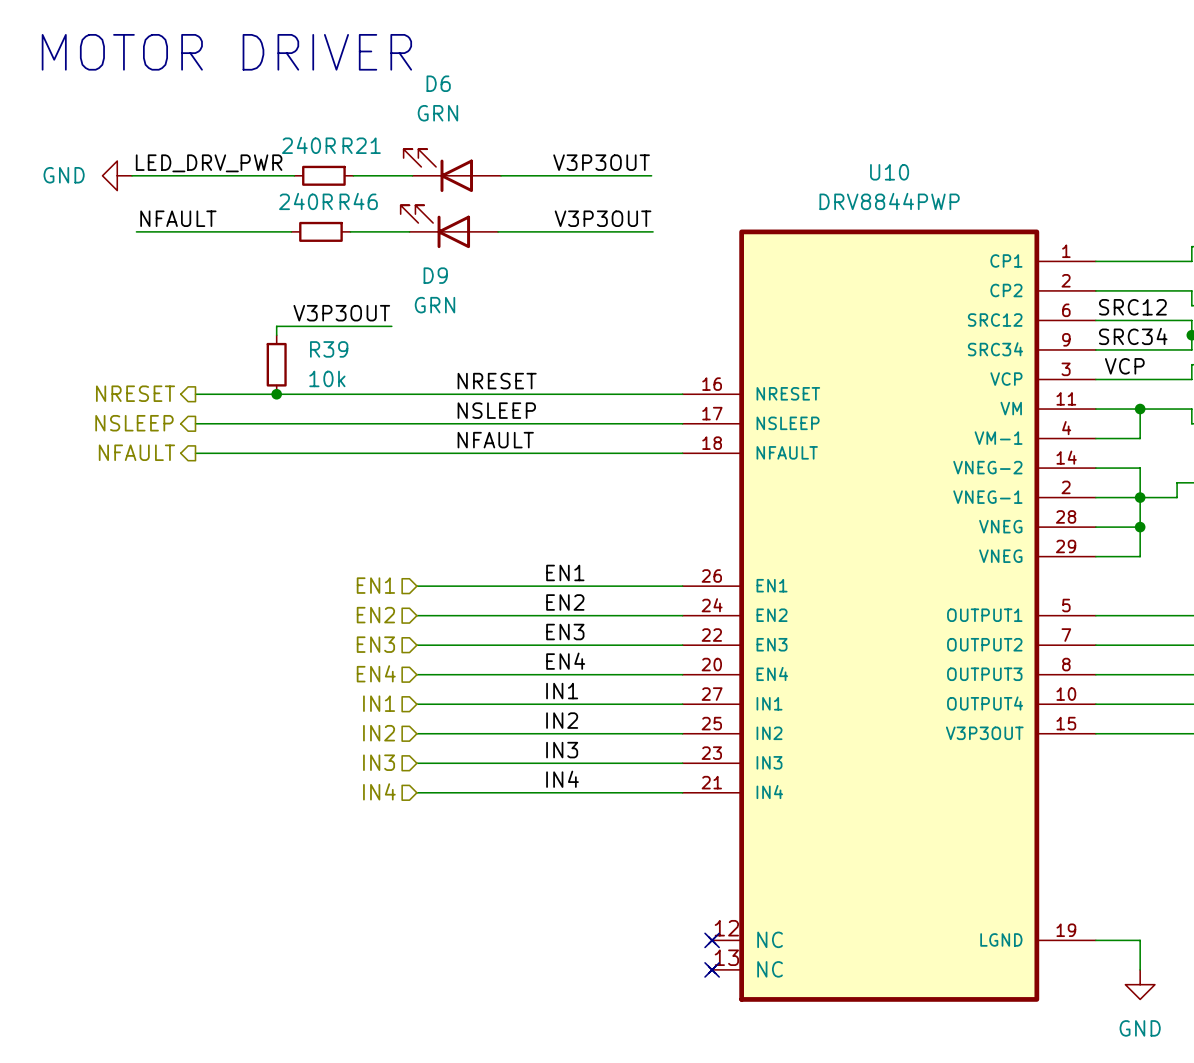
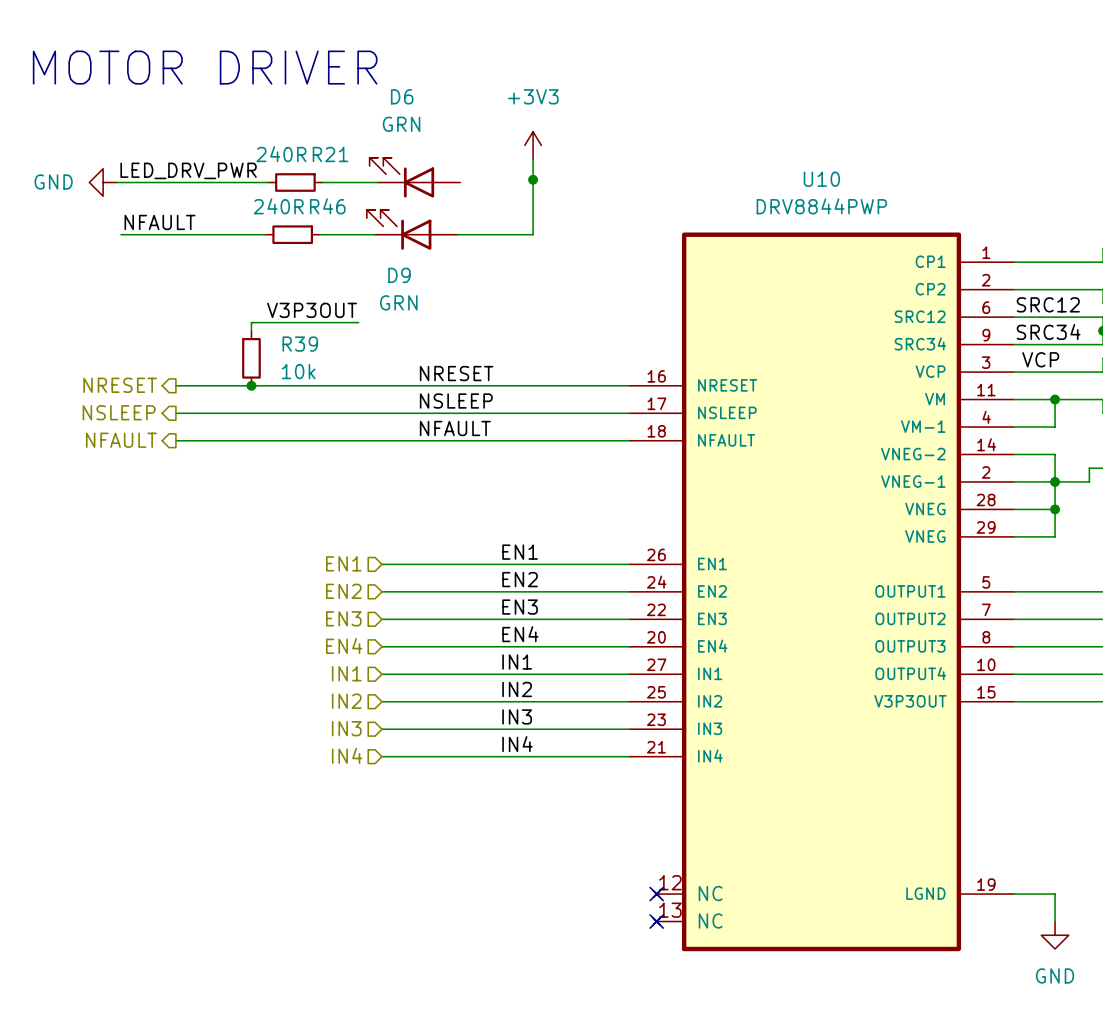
power symbol: none -> +3V3 (533, 145)
label: V3P3OUT (601, 162) -> none
junction: none -> (533, 179)
wire: (501, 175) (651, 175) -> none
label: V3P3OUT (603, 218) -> none
wire: (579, 231) (653, 231) -> (533, 234) (533, 159)

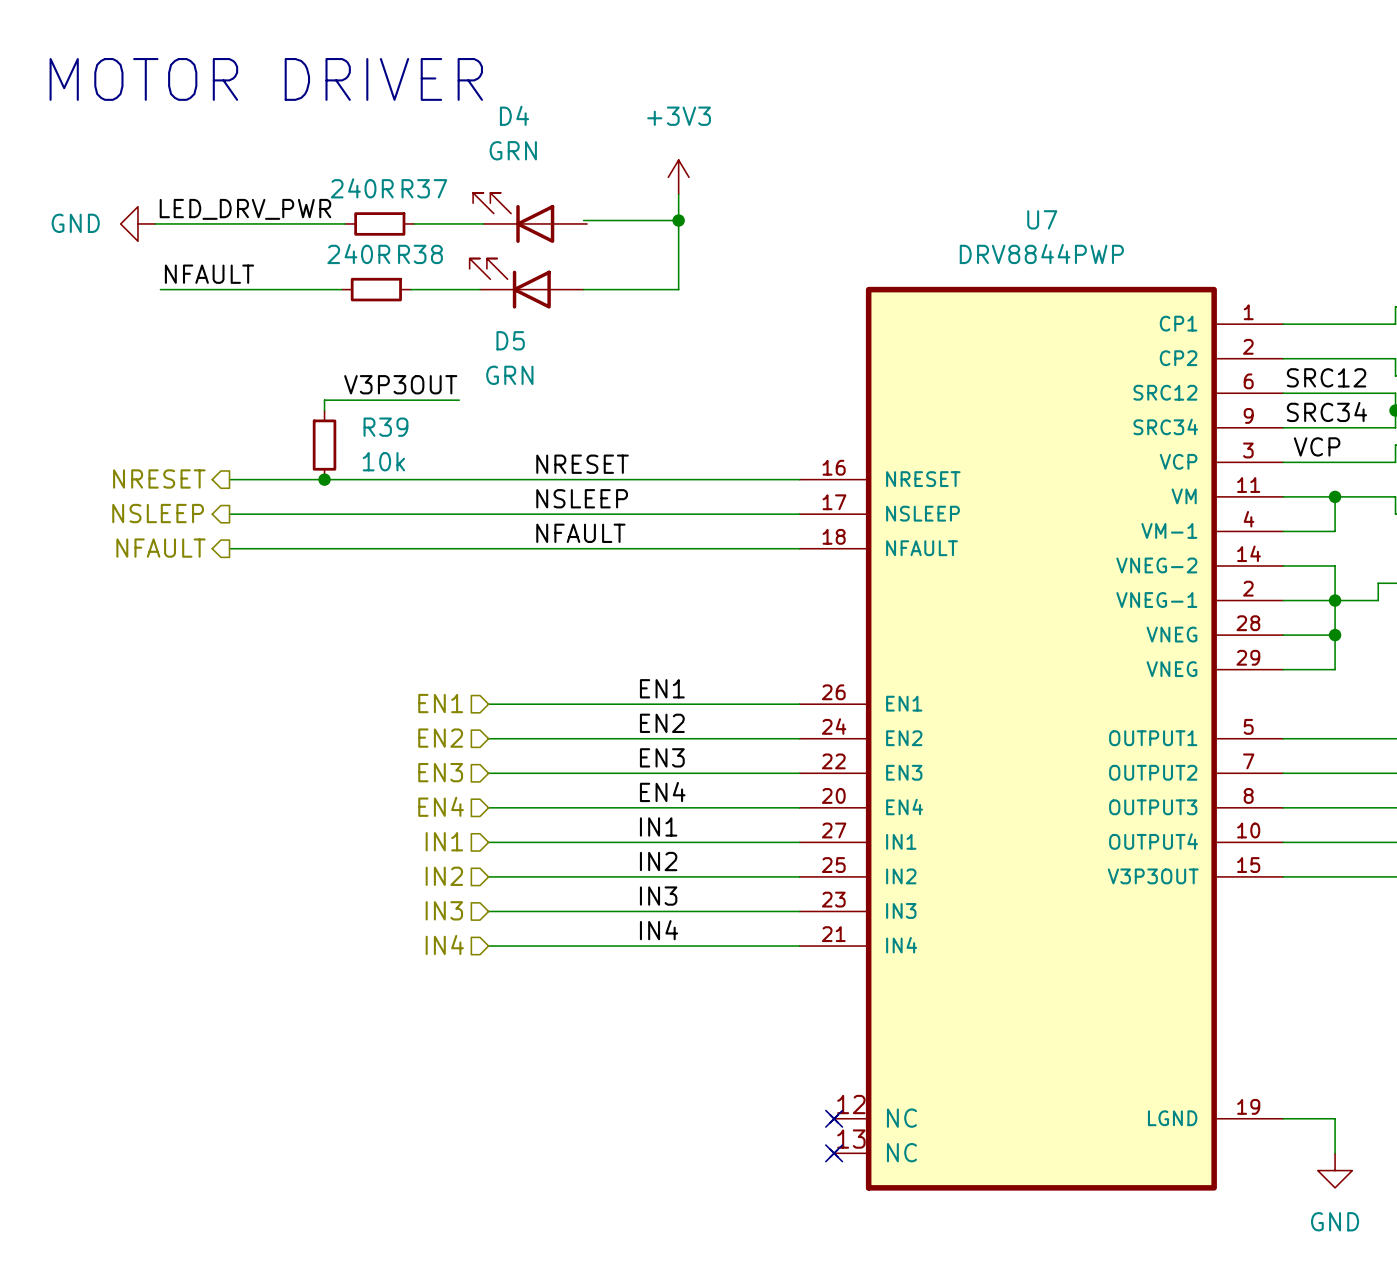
D6 name: D6 (402, 96) -> D4 (514, 115)
R21 name: R21 (330, 154) -> R37 (424, 188)
wire: none -> (583, 220) (678, 220)
U10 name: U10 (821, 179) -> U7 (1042, 219)
R46 name: R46 (327, 206) -> R38 (420, 254)
D9 name: D9 (399, 275) -> D5 (510, 340)

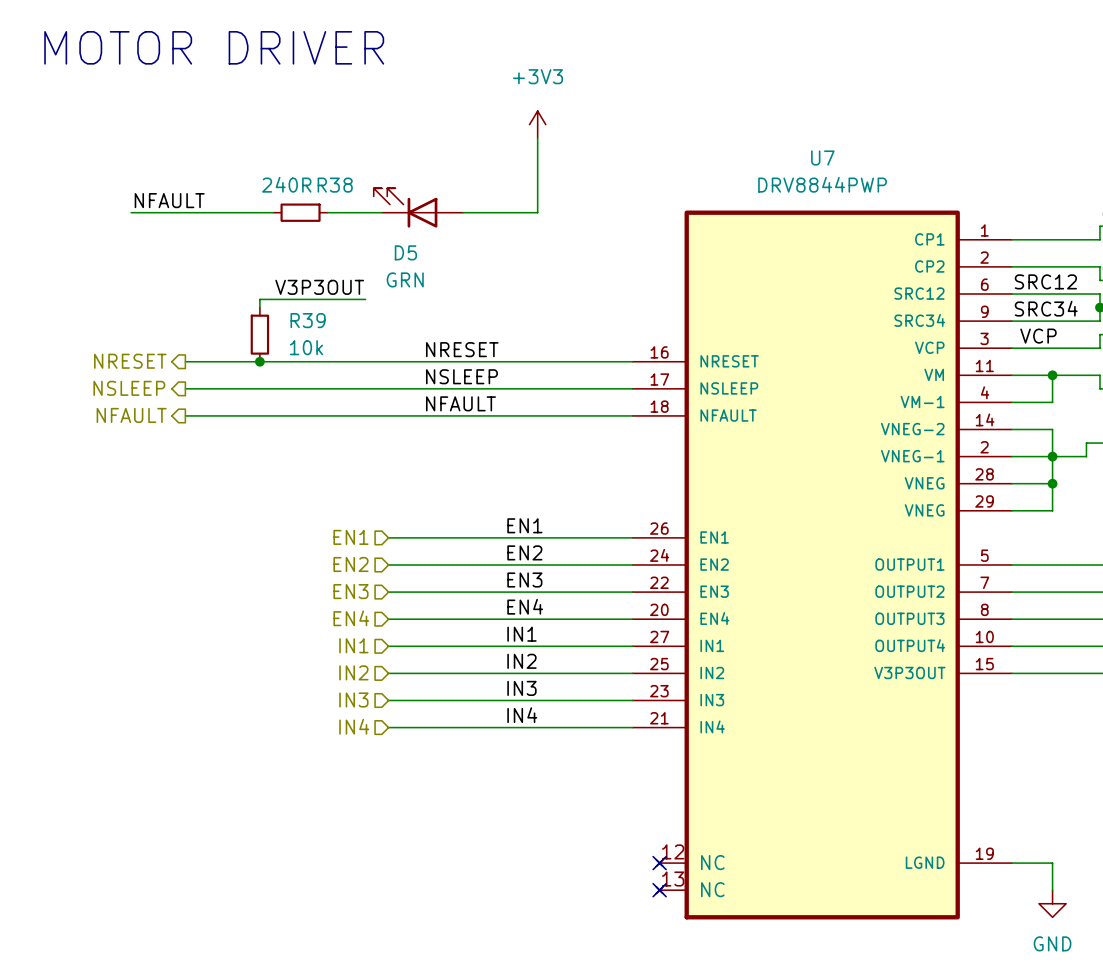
label: LED_DRV_PWR (245, 209) -> none
D4: GRN (530, 217) -> none
wire: (583, 220) (678, 220) -> none
junction: (678, 220) -> none
power symbol: GND (137, 223) -> none
wire: (155, 223) (345, 223) -> none
R37: 240R (379, 223) -> none
wire: (414, 223) (483, 223) -> none

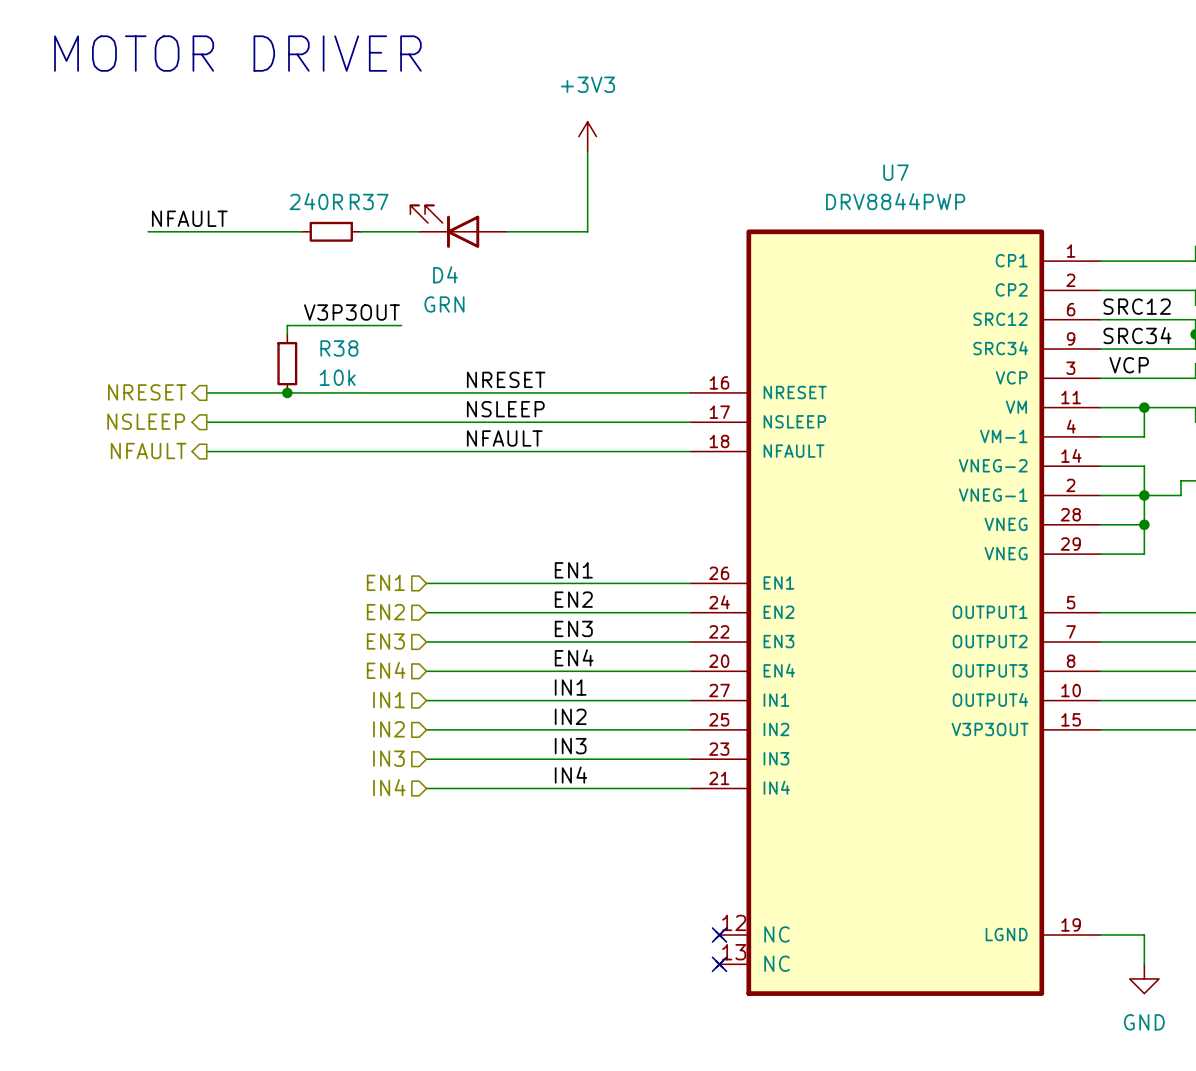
R38 name: R38 (335, 185) -> R37 (369, 201)
D5 name: D5 (405, 252) -> D4 (445, 274)
R39 name: R39 (308, 320) -> R38 (339, 348)

